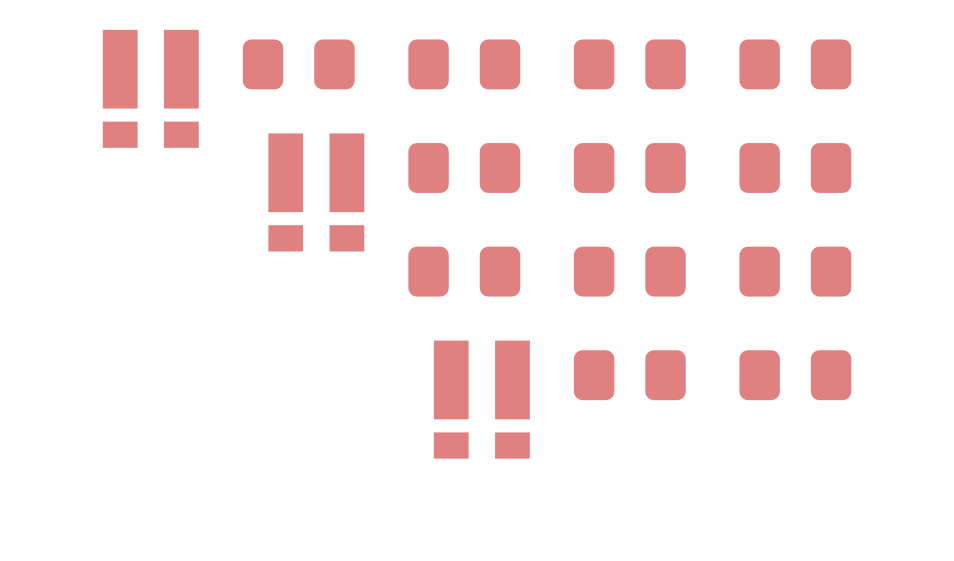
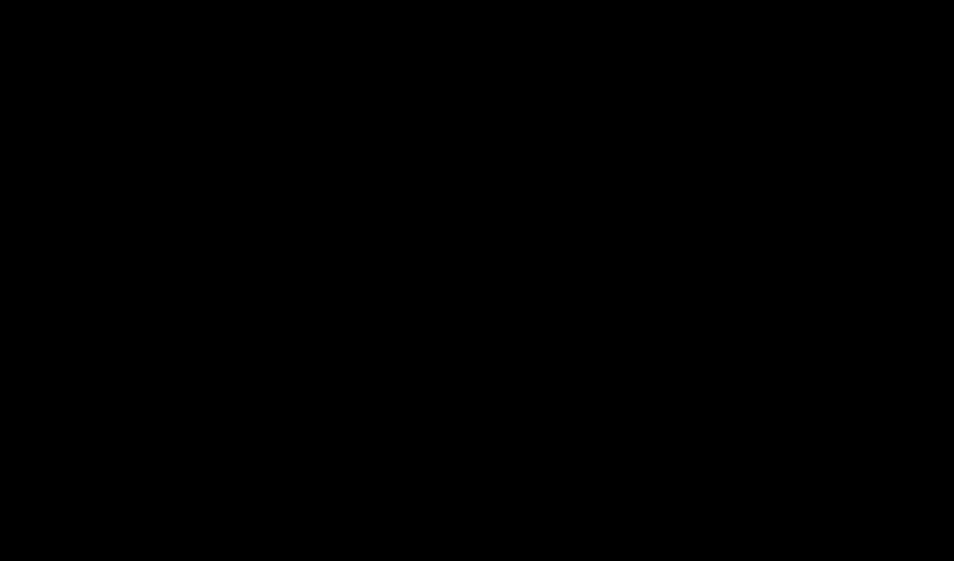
part: (298, 64) -> none
part: (464, 64) -> none
part: (629, 64) -> none
part: (795, 64) -> none
part: (150, 88) -> none
part: (464, 168) -> none
part: (629, 168) -> none
part: (795, 168) -> none
part: (316, 192) -> none
part: (464, 271) -> none
part: (629, 271) -> none
part: (795, 271) -> none
part: (629, 375) -> none
part: (795, 375) -> none
part: (481, 399) -> none

